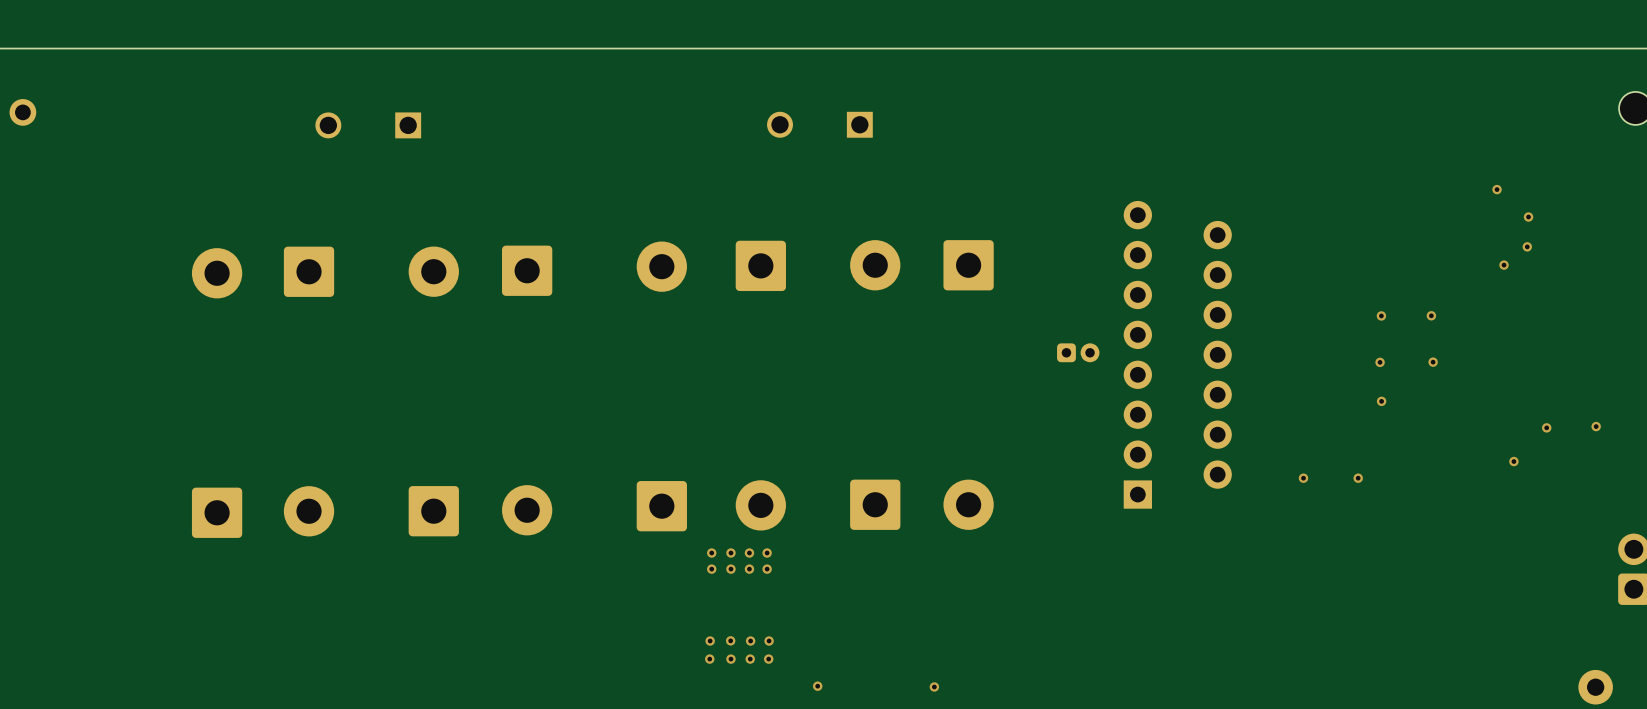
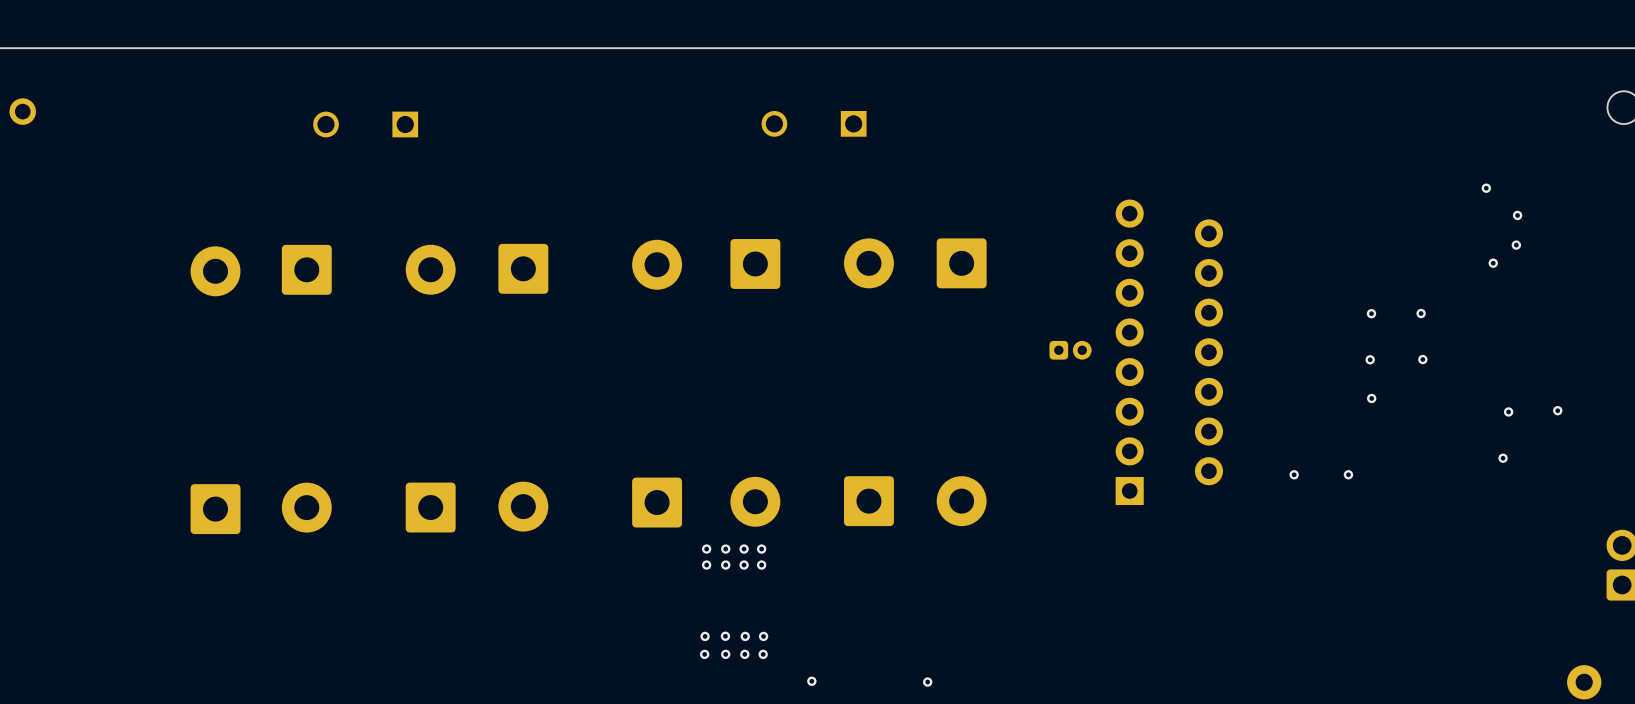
via: none -> (1557, 410)
via: none -> (1508, 411)
via: (1596, 426) -> none
via: (1546, 427) -> none

